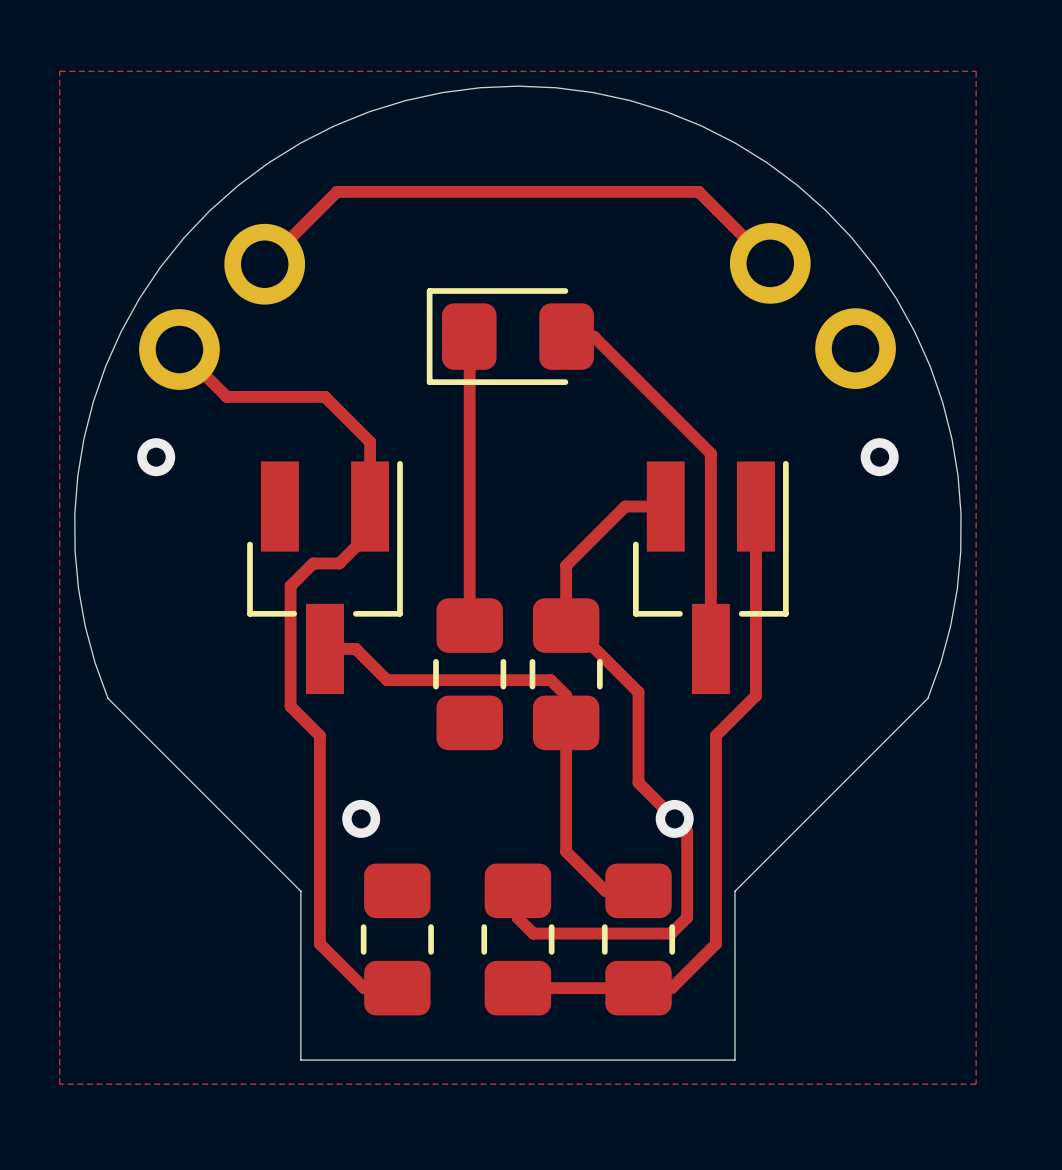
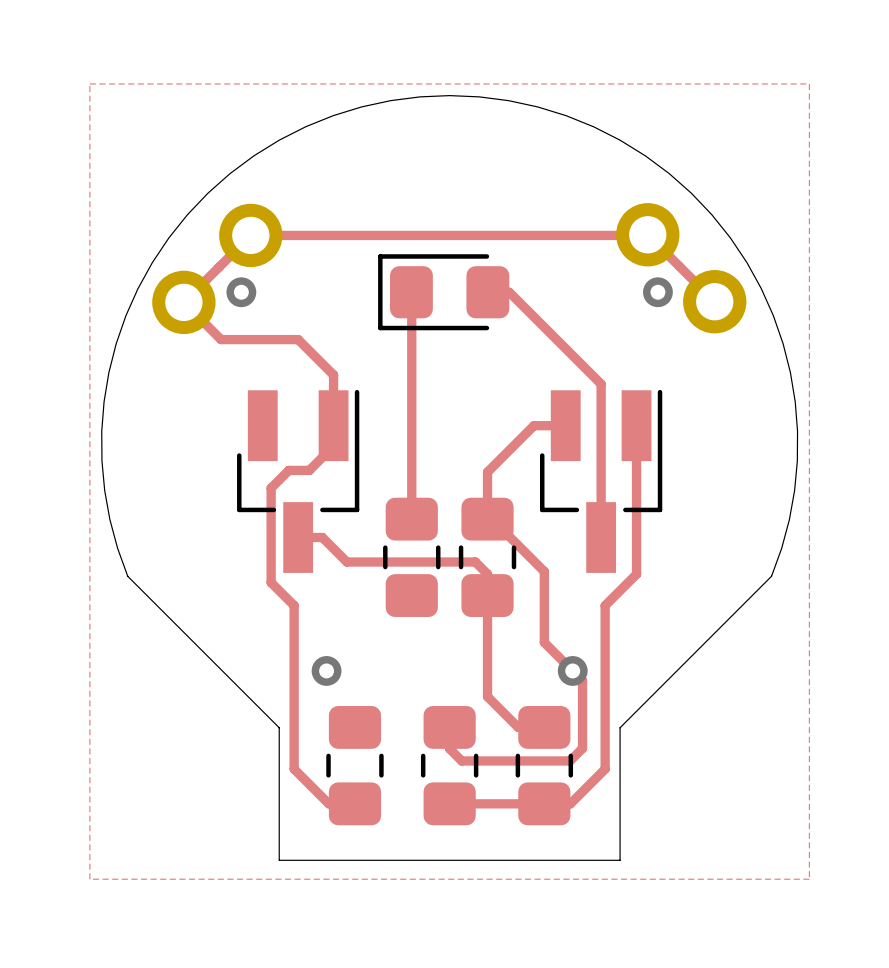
track: (770, 263) (698, 191) (337, 191) (264, 264) -> none
track: none -> (714, 301) (647, 234) (250, 235) (183, 302)
via position: (156, 457) -> (241, 292)
via position: (879, 457) -> (657, 292)

